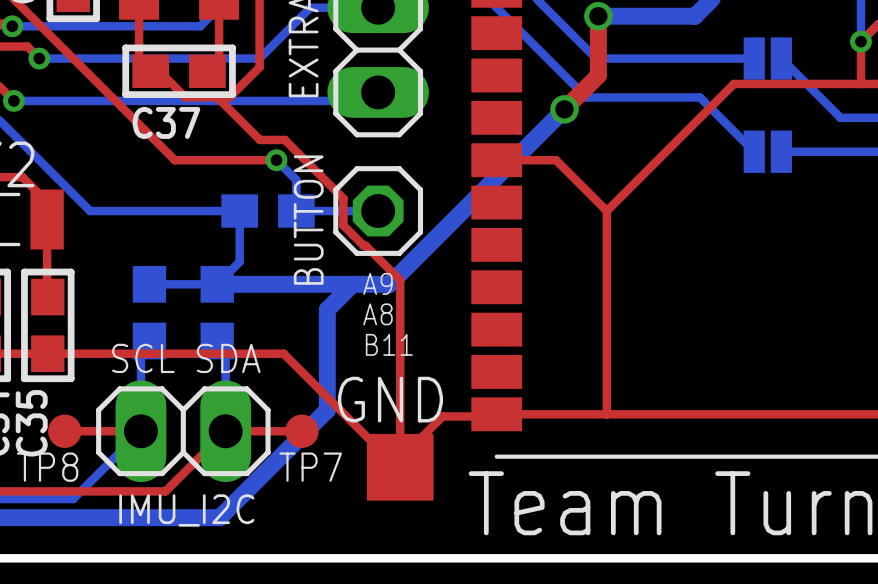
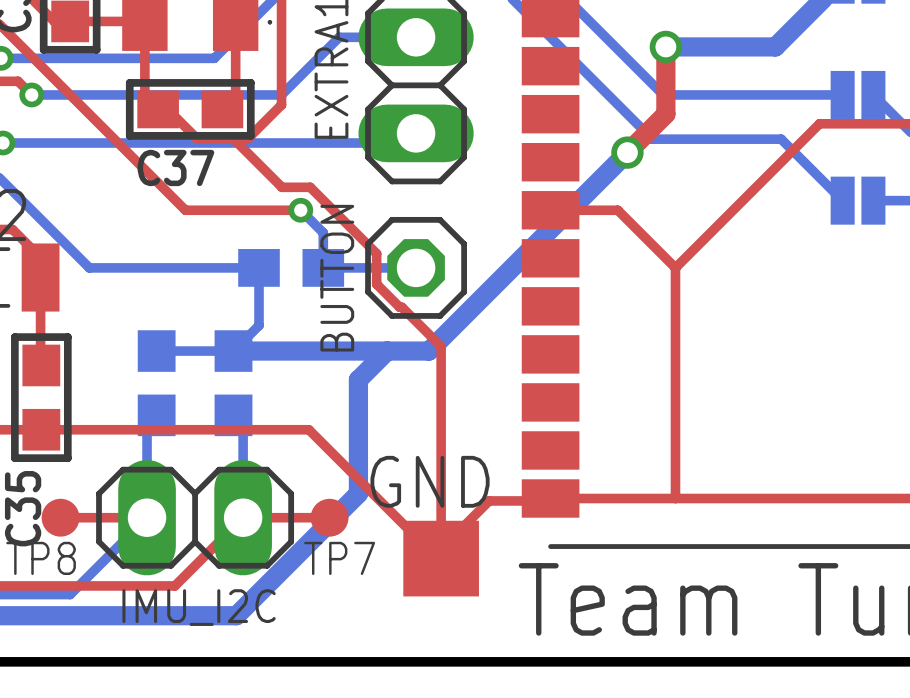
text: A9 (377, 283) -> none
text: A8 (377, 314) -> none
text: B11 (389, 344) -> none
text: SCL (143, 358) -> none
text: SDA (228, 358) -> none

